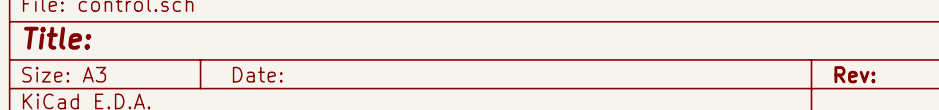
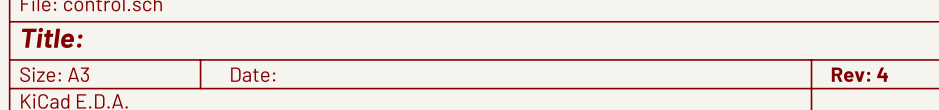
title block: Rev: (854, 74) -> Rev: 4 (859, 74)

